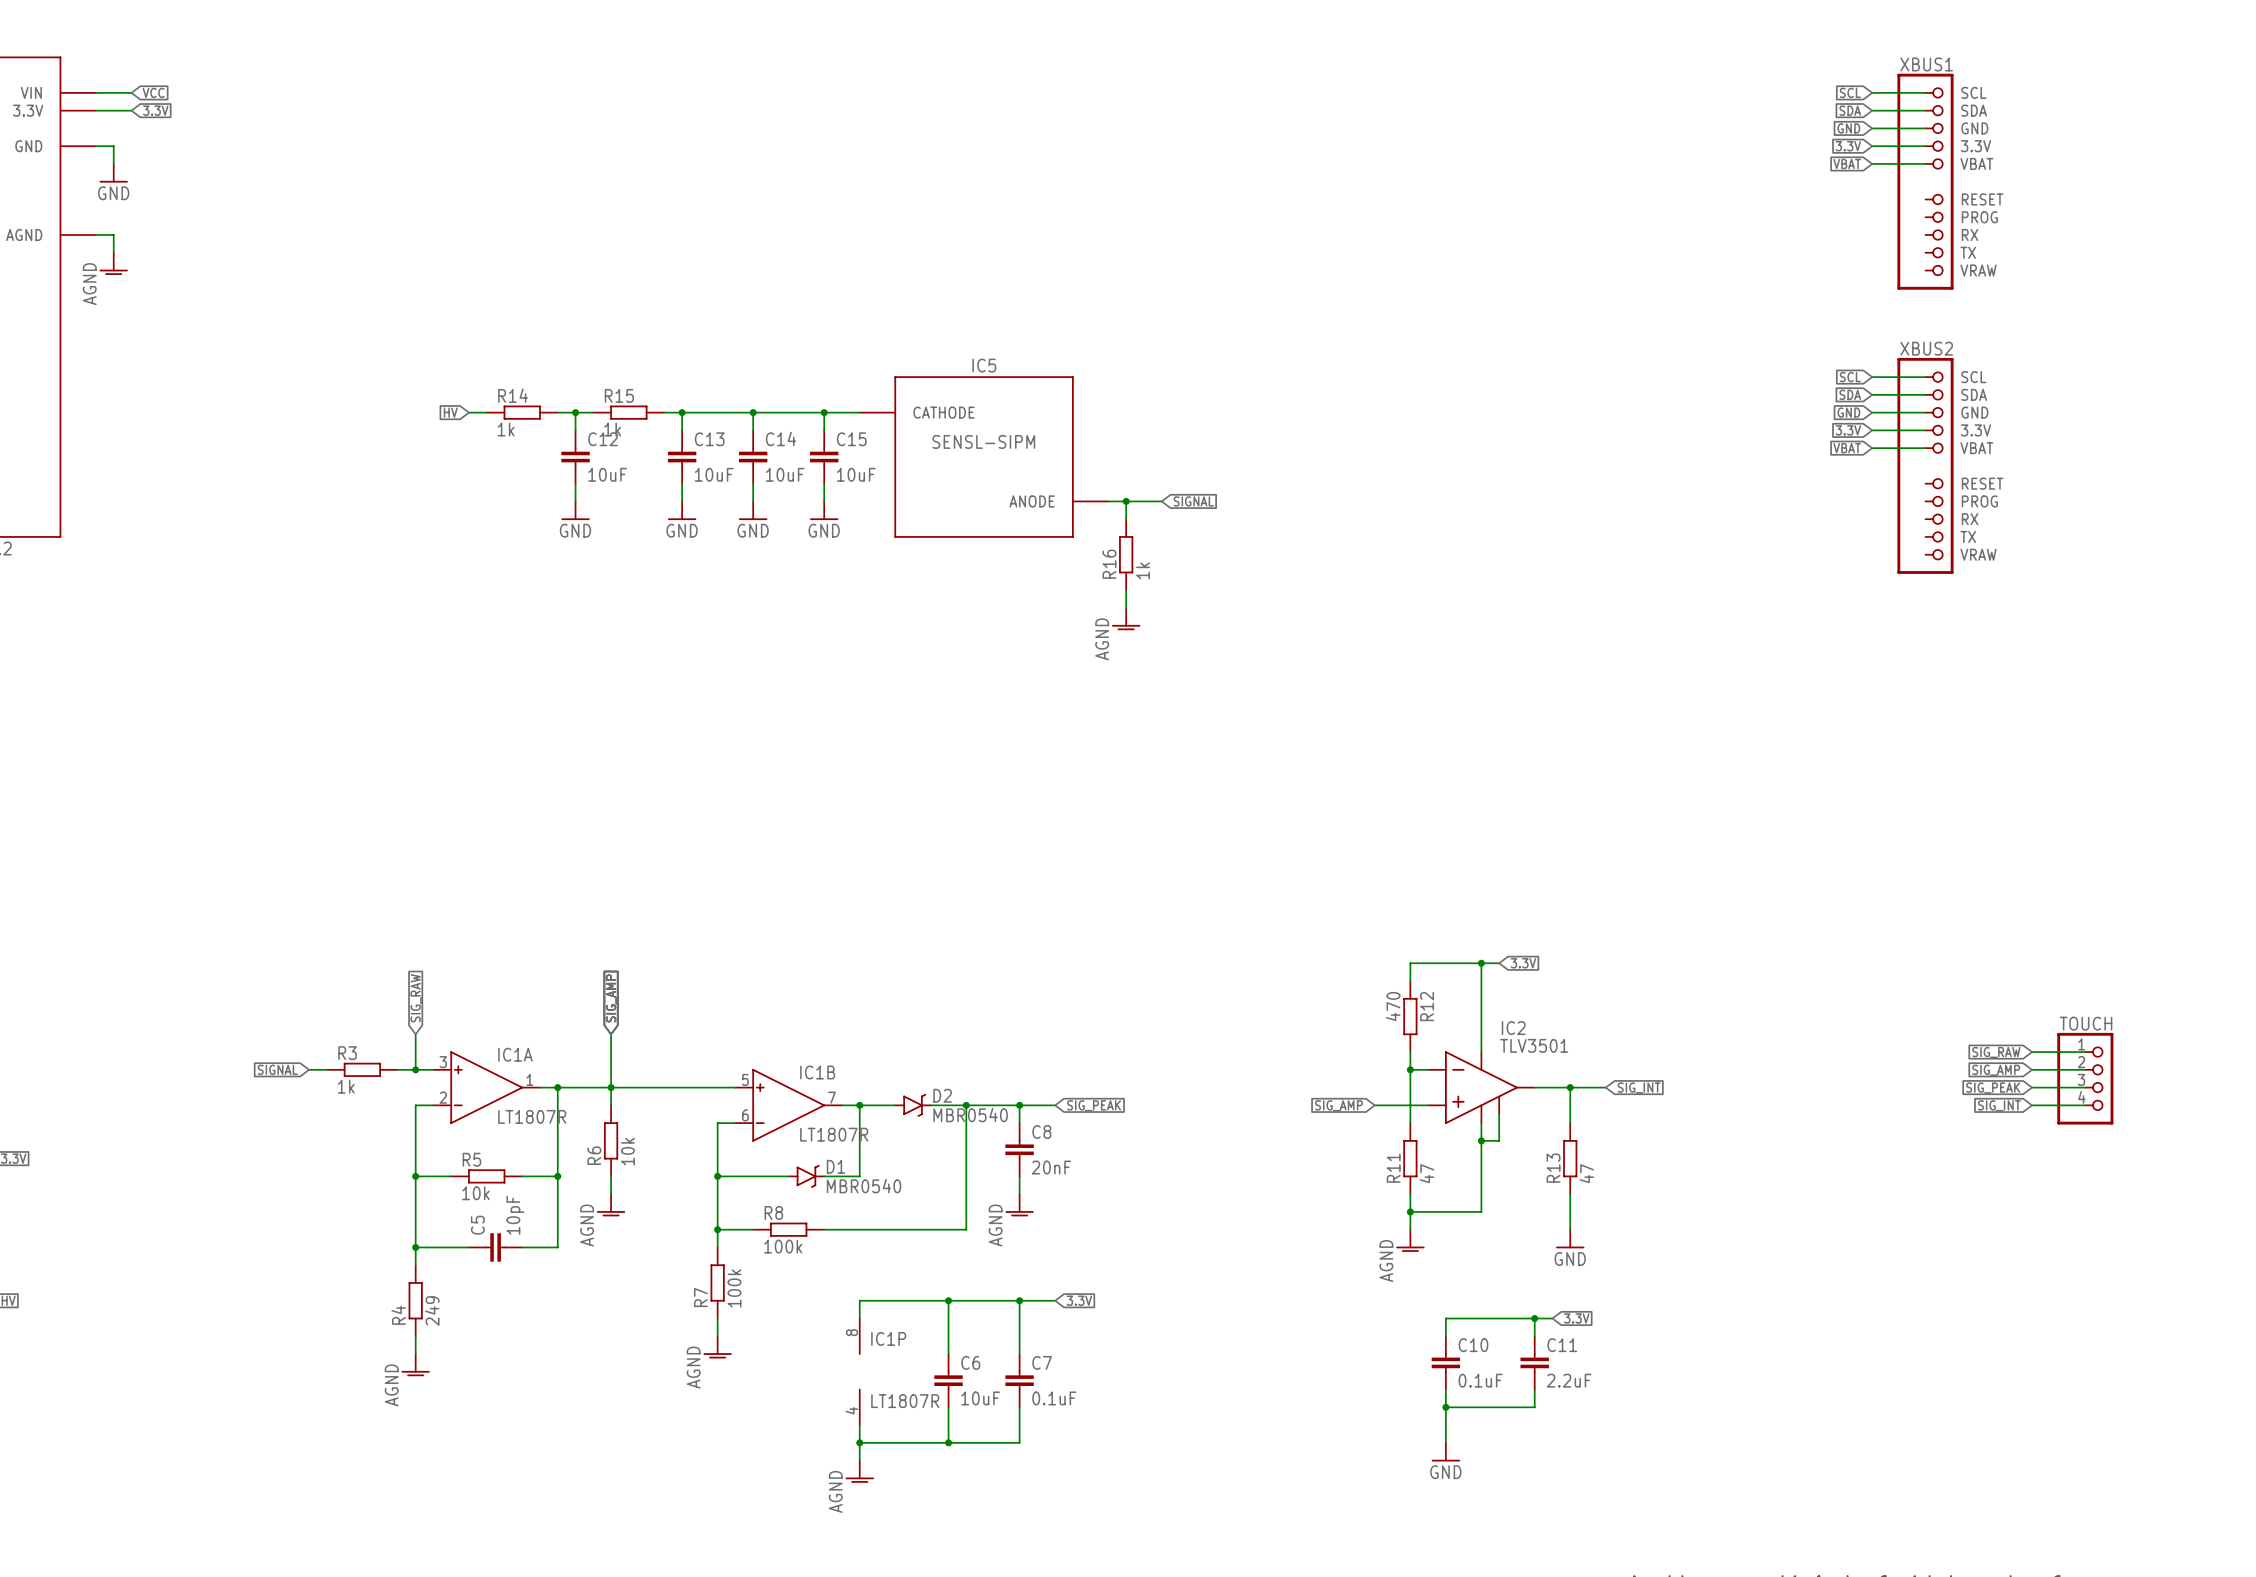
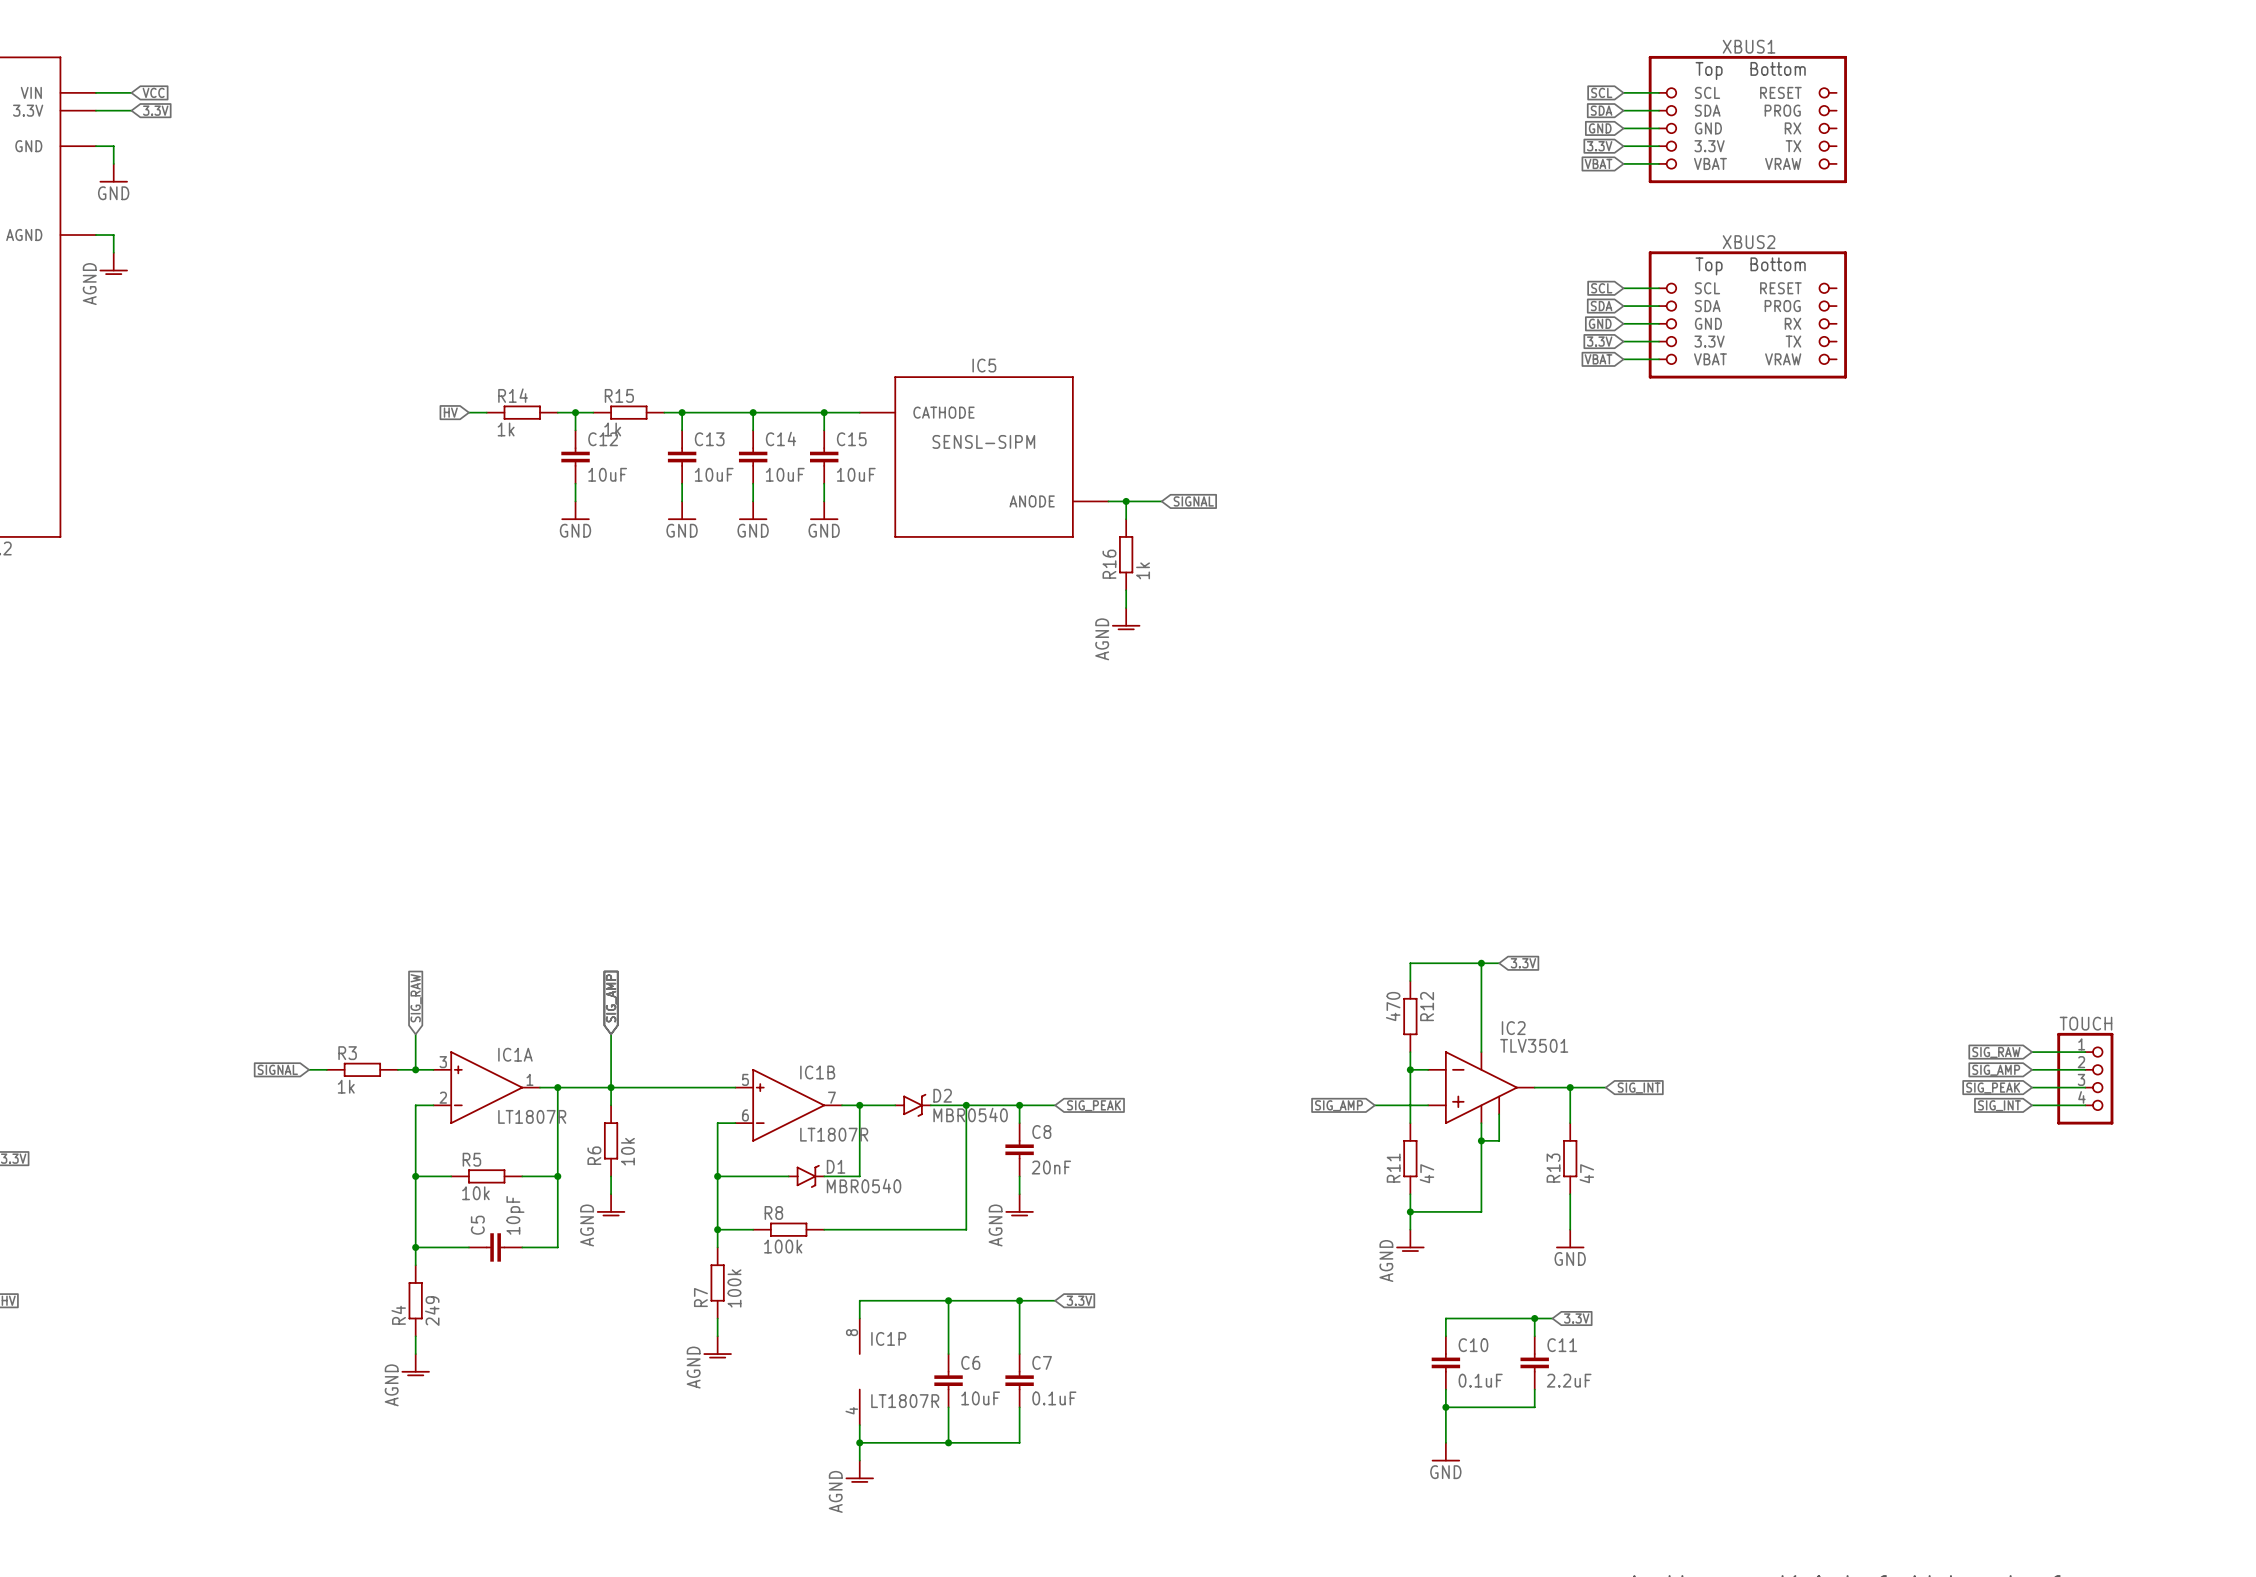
XBUS1 name position: XBUS1 (1926, 64) -> XBUS1 (1749, 46)
XBUS1 symbol: [1897, 73, 1954, 290] -> [1648, 55, 1847, 184]
global label: none -> SCL (1601, 92)
wire: none -> (1623, 92) (1659, 92)
global label: SCL (1850, 92) -> none
wire: (1872, 92) (1925, 92) -> none
global label: none -> SDA (1601, 110)
wire: none -> (1623, 110) (1659, 110)
global label: SDA (1850, 110) -> none
wire: (1872, 110) (1925, 110) -> none
global label: none -> GND (1600, 128)
wire: none -> (1623, 128) (1659, 128)
global label: GND (1848, 128) -> none
wire: (1872, 128) (1925, 128) -> none
global label: none -> 3.3V (1599, 146)
wire: none -> (1623, 146) (1659, 146)
global label: 3.3V (1848, 146) -> none
wire: (1872, 146) (1925, 146) -> none
global label: none -> VBAT (1598, 163)
wire: none -> (1623, 163) (1659, 163)
global label: VBAT (1847, 163) -> none
wire: (1872, 163) (1925, 163) -> none
global label: none -> SCL (1601, 288)
wire: none -> (1623, 288) (1659, 288)
global label: none -> SDA (1601, 306)
wire: none -> (1623, 306) (1659, 306)
global label: none -> GND (1600, 323)
wire: none -> (1623, 323) (1659, 323)
global label: none -> 3.3V (1599, 341)
wire: none -> (1623, 341) (1659, 341)
XBUS2 name position: XBUS2 (1926, 348) -> XBUS2 (1749, 242)
XBUS2 symbol: [1897, 357, 1954, 574] -> [1648, 251, 1847, 379]
global label: none -> VBAT (1598, 359)
wire: none -> (1623, 359) (1659, 359)
global label: SCL (1850, 377) -> none
wire: (1872, 377) (1925, 377) -> none
global label: SDA (1850, 394) -> none
wire: (1872, 394) (1925, 394) -> none
global label: GND (1848, 412) -> none
wire: (1872, 412) (1925, 412) -> none
global label: 3.3V (1848, 430) -> none
wire: (1872, 430) (1925, 430) -> none
global label: VBAT (1847, 448) -> none
wire: (1872, 448) (1925, 448) -> none

